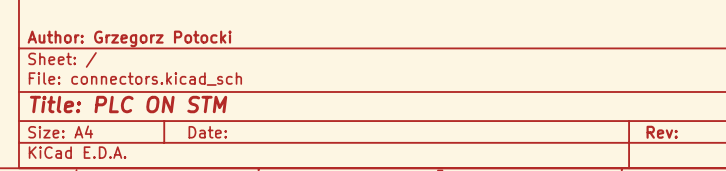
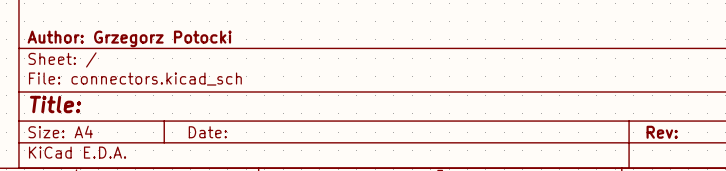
title block: Title: PLC ON STM (128, 104) -> Title: (55, 104)

